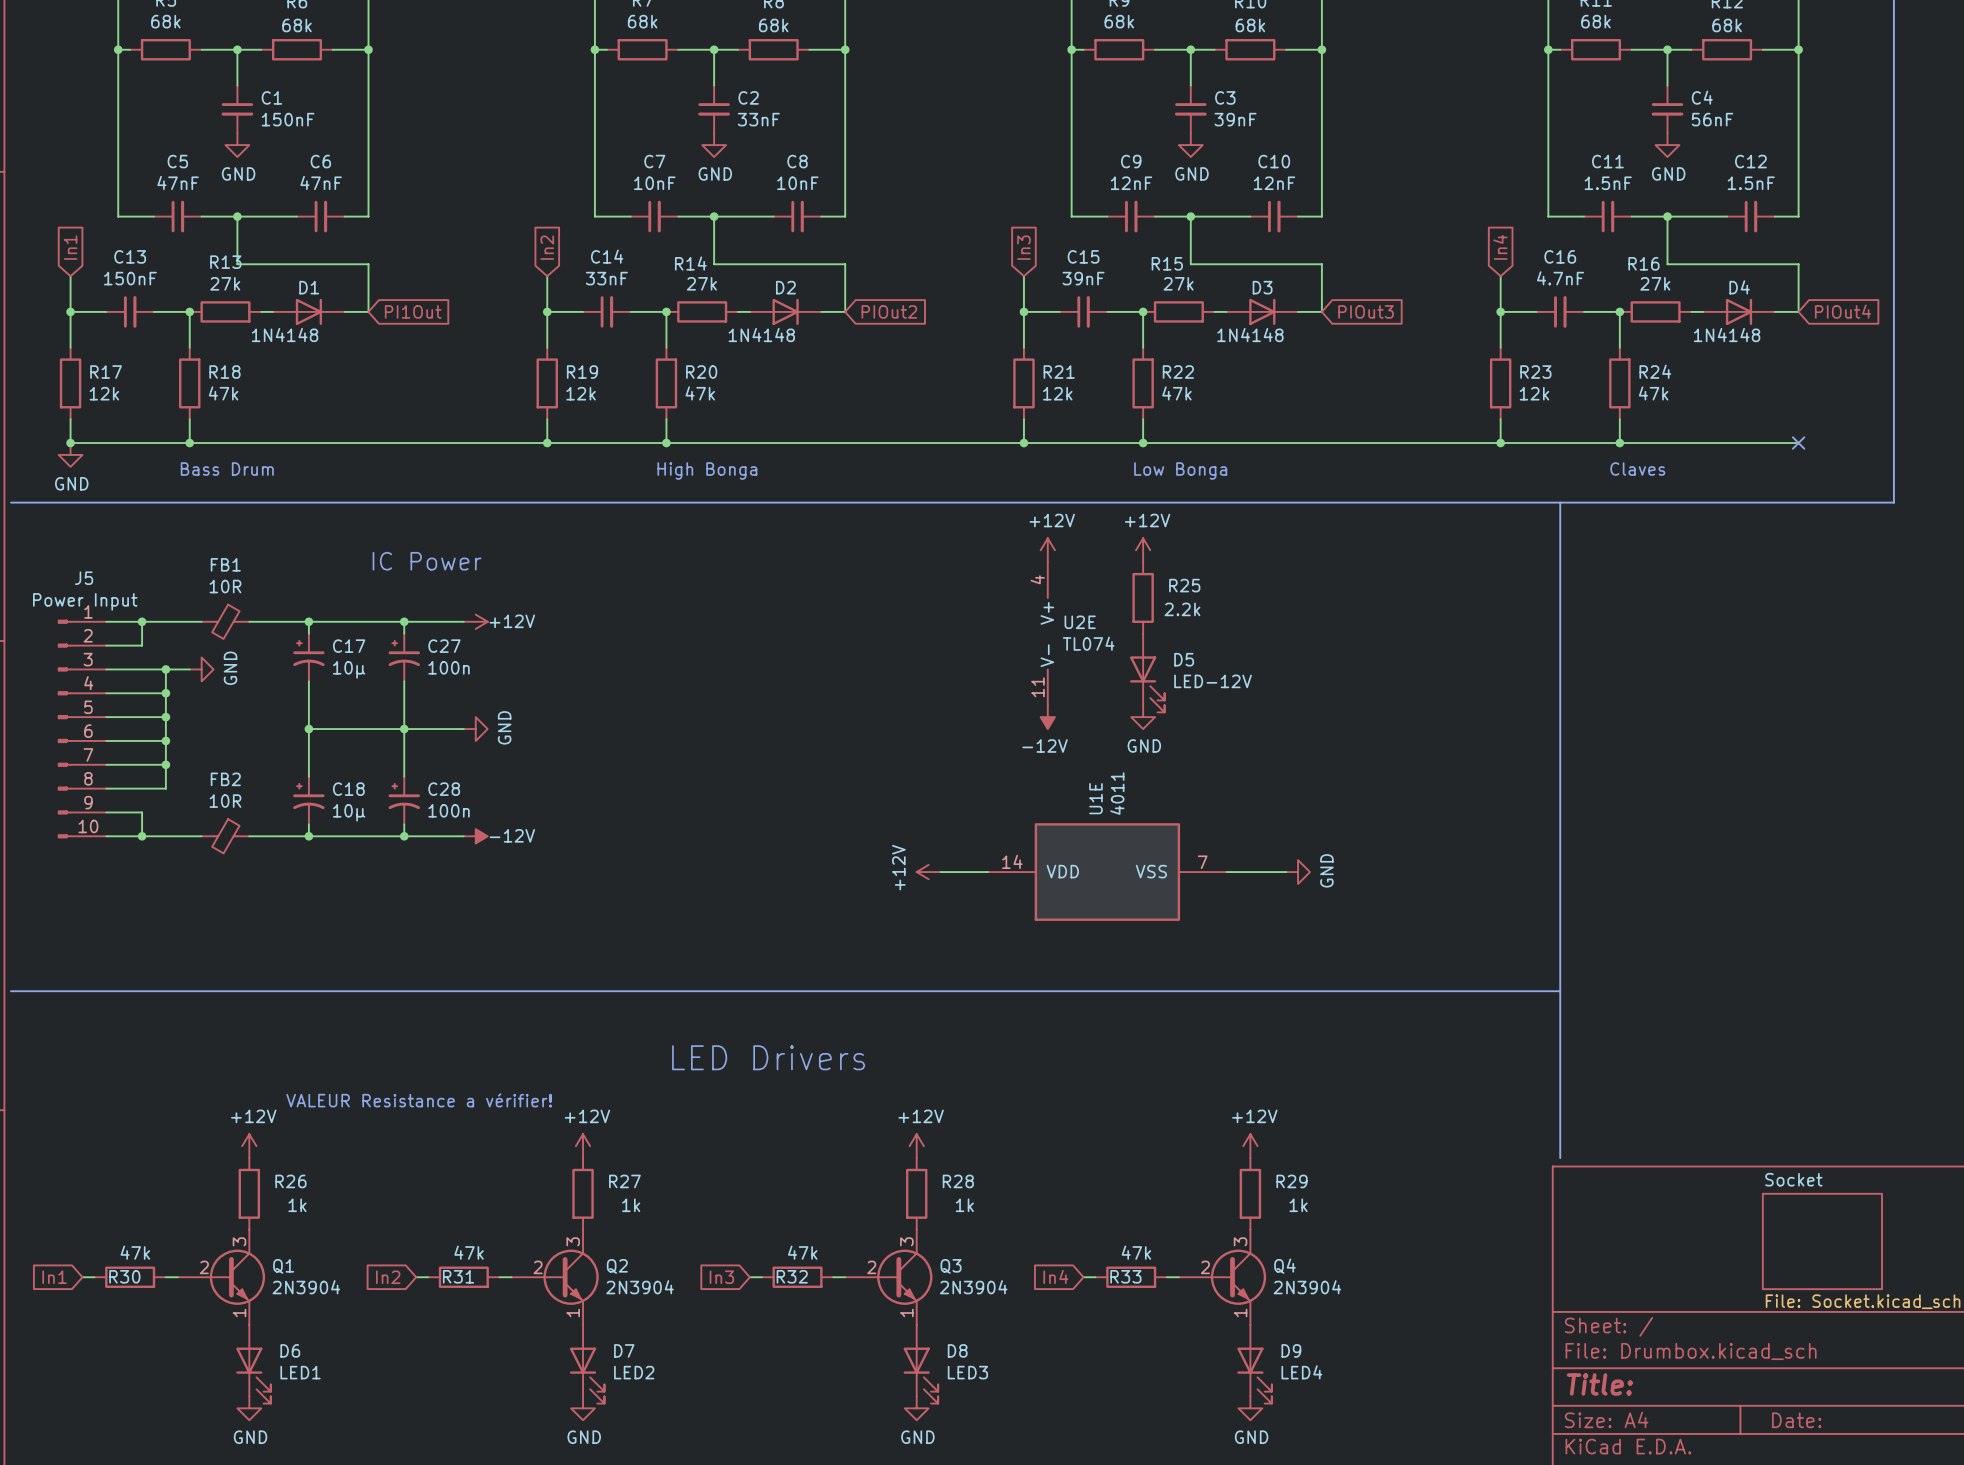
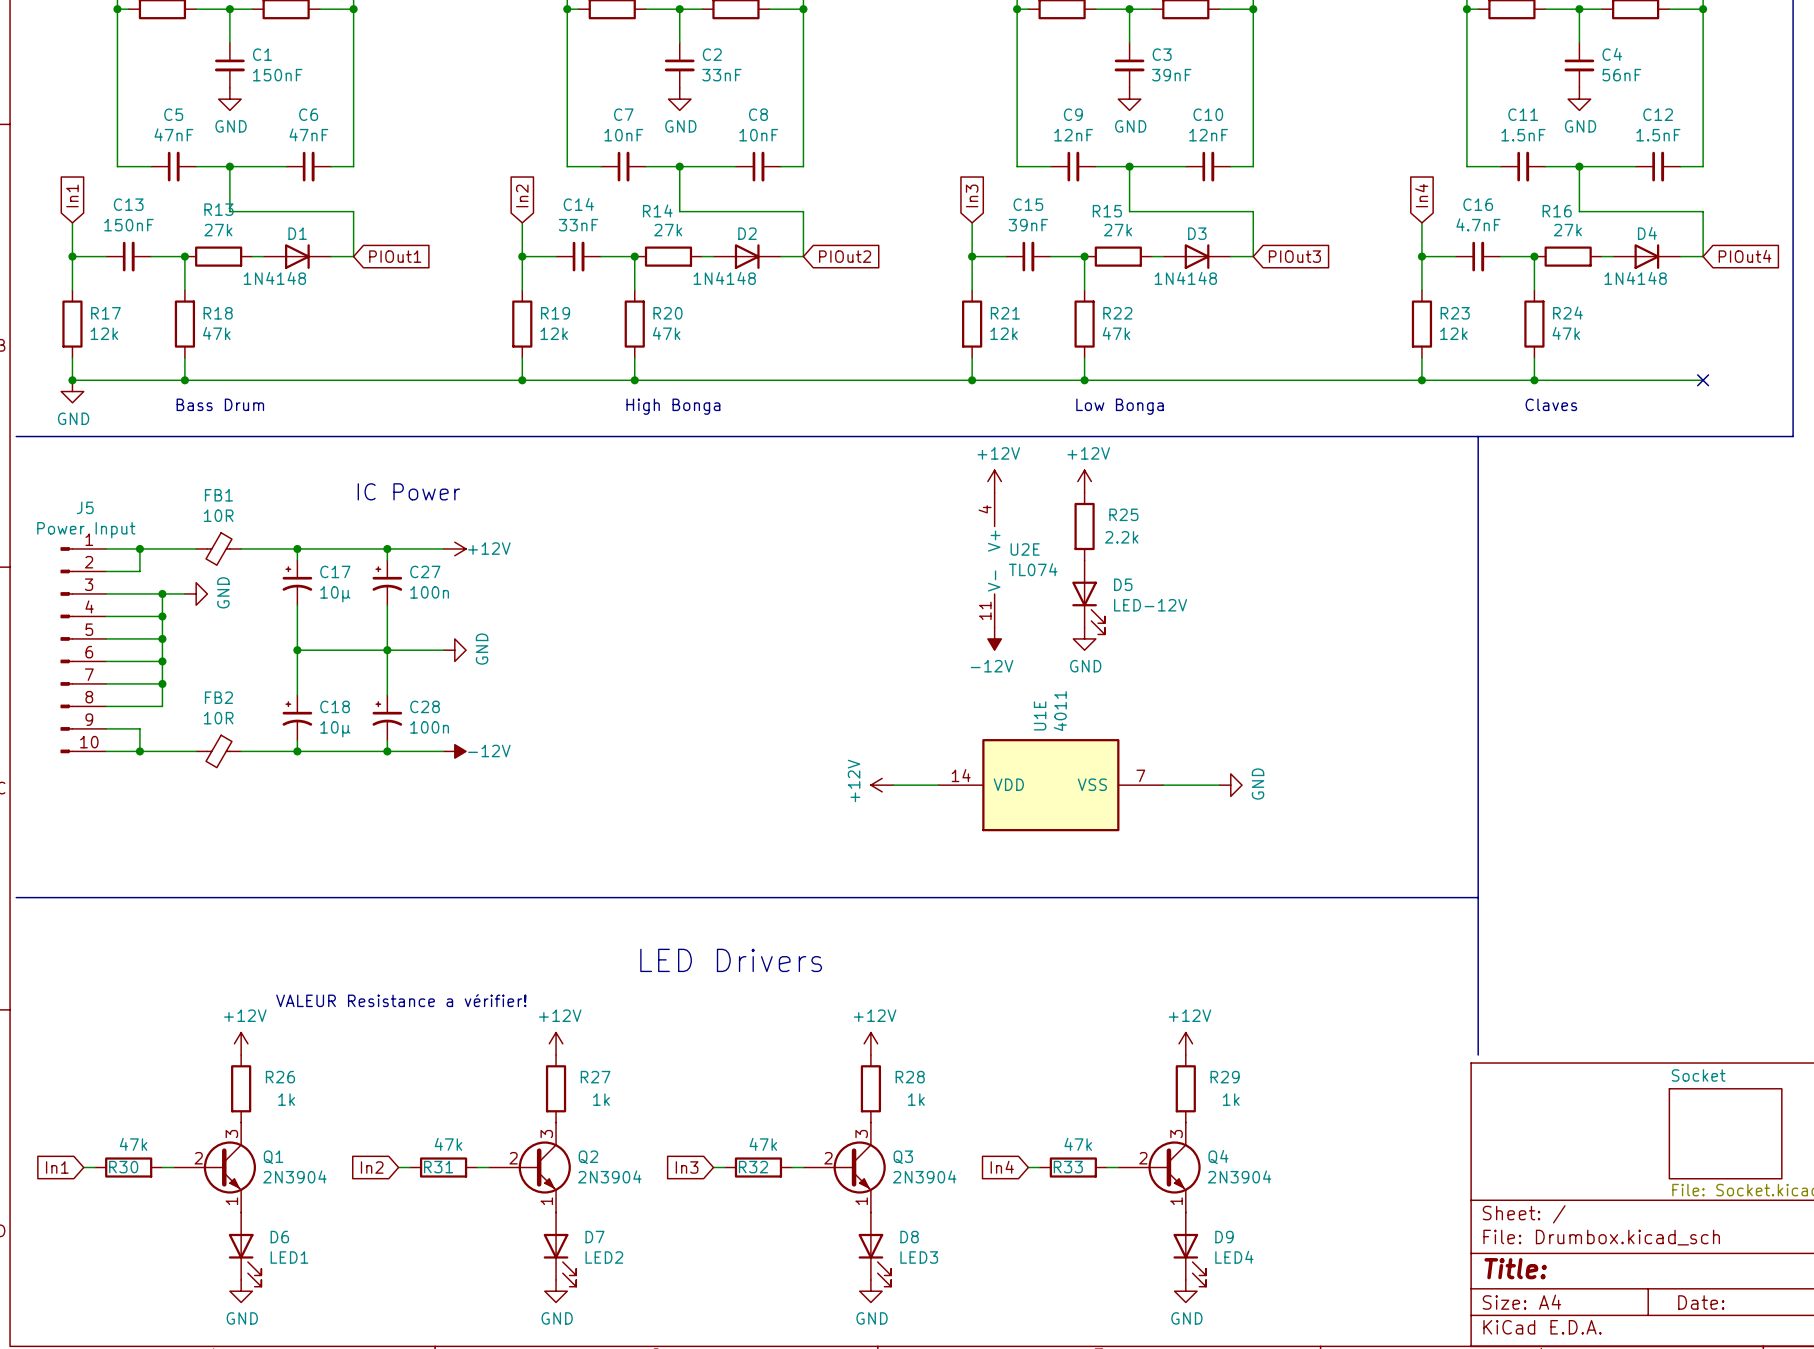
global label: PI1Out (413, 311) -> PIOut1 (395, 256)

